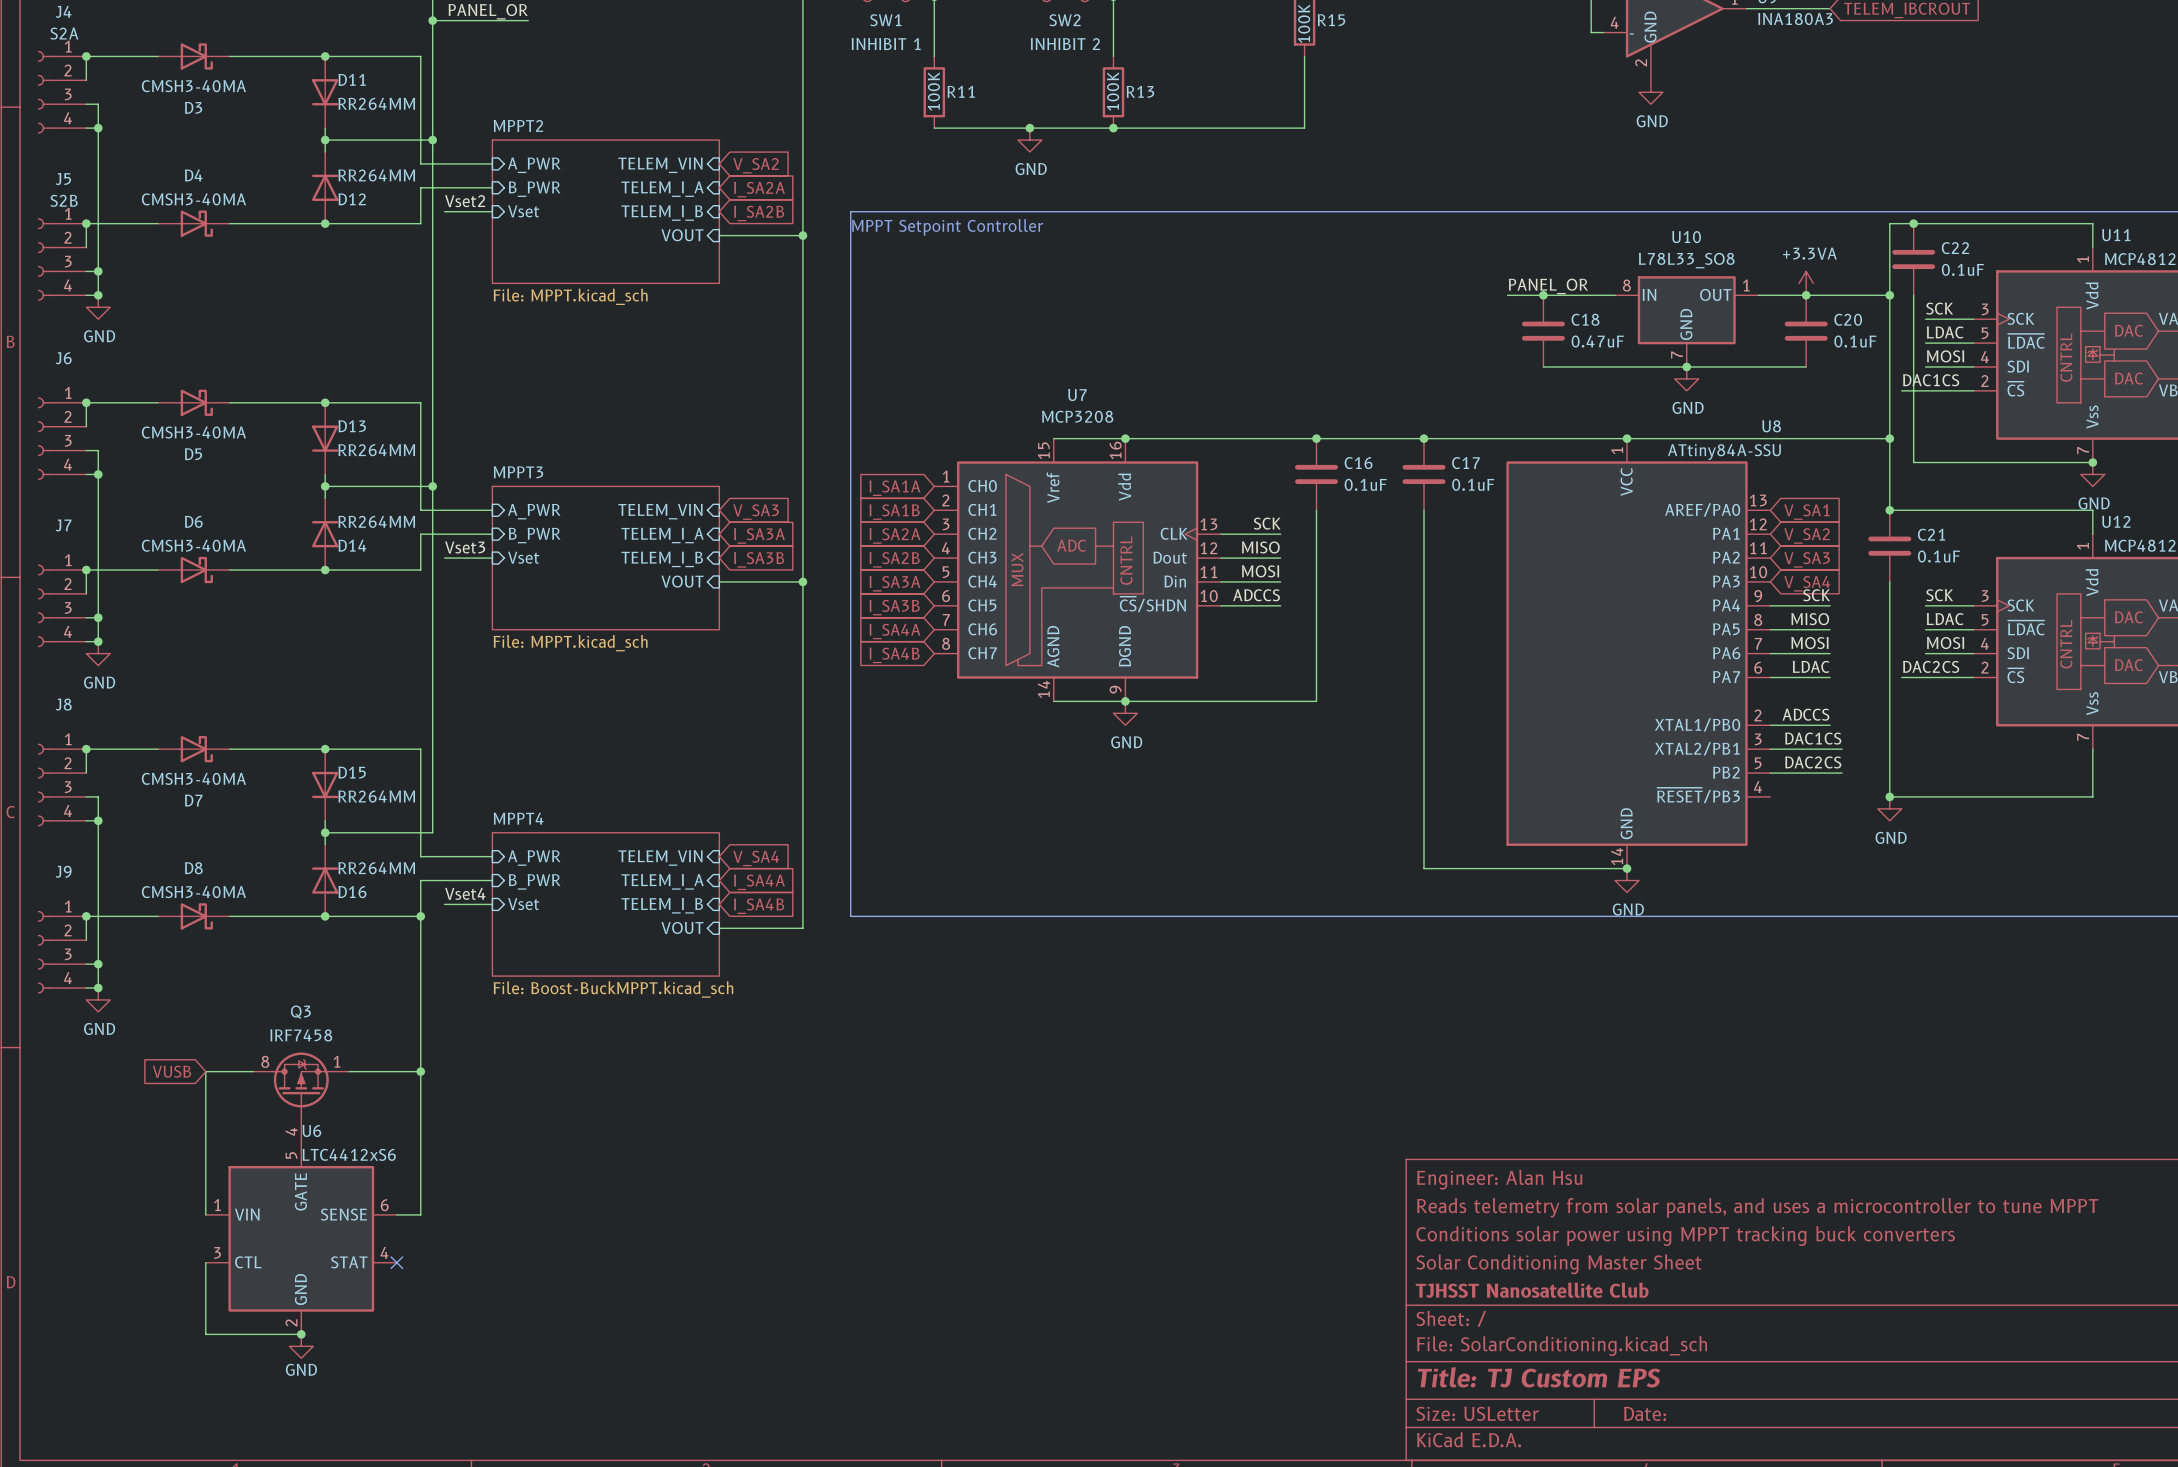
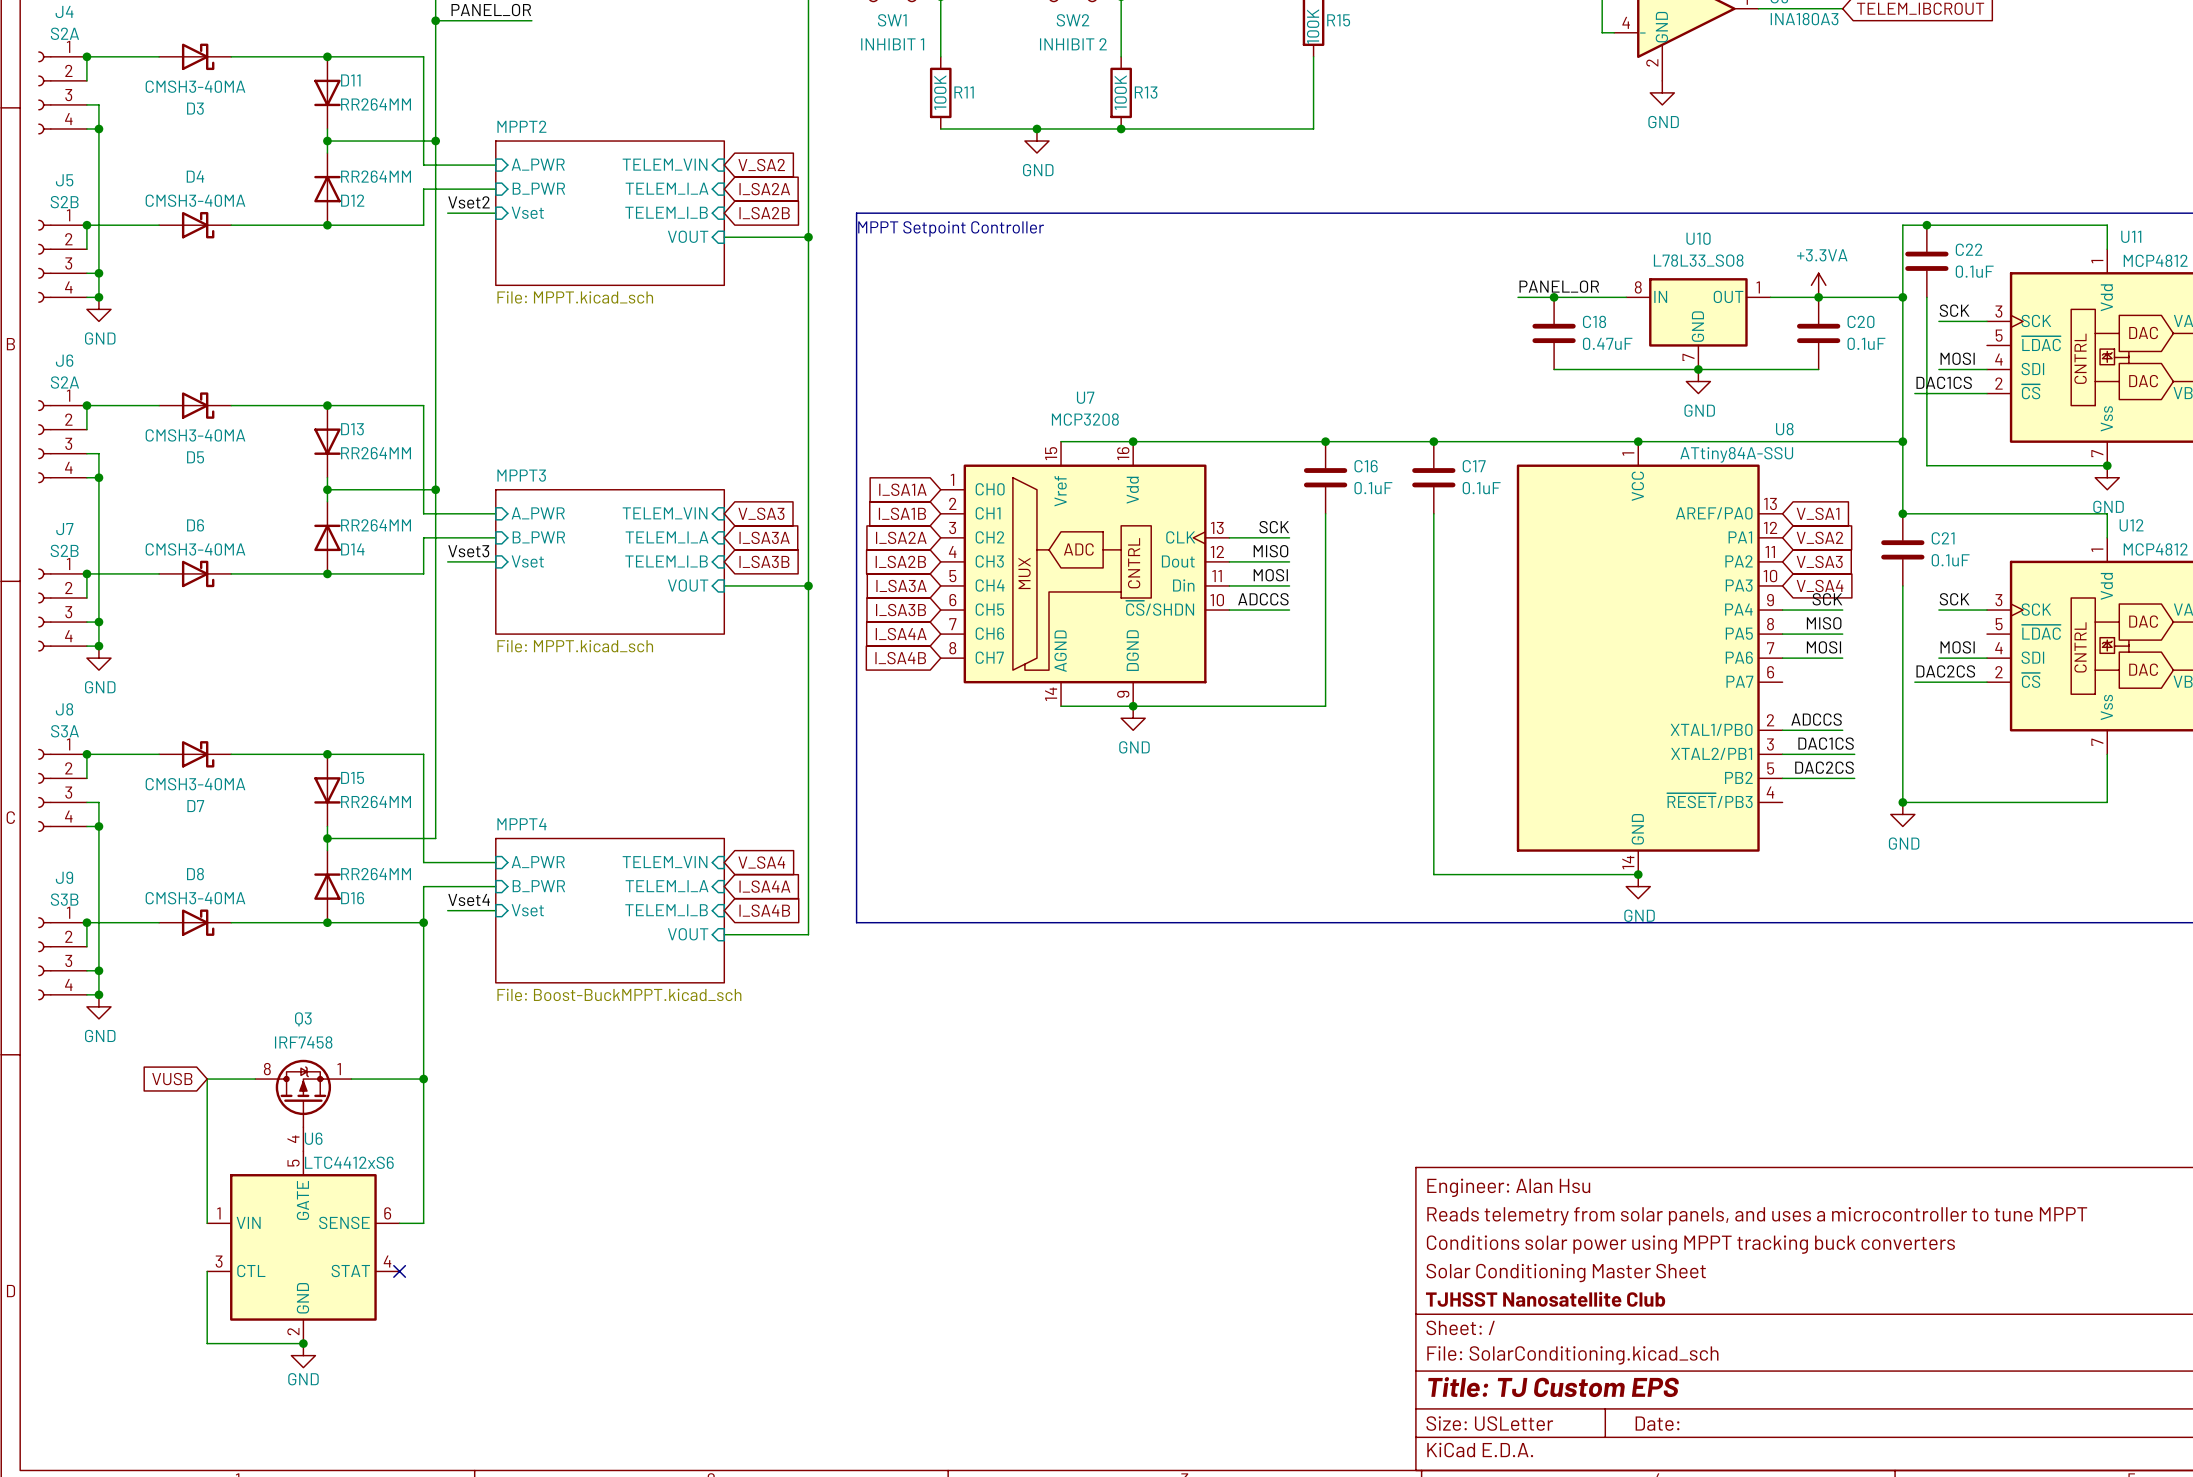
label: LDAC (1945, 332) -> none
wire: (1925, 343) (1973, 343) -> none
J6 value: none -> S2A (64, 382)
J7 value: none -> S2B (64, 550)
label: LDAC (1945, 619) -> none
wire: (1925, 629) (1973, 629) -> none
label: LDAC (1811, 666) -> none
wire: (1770, 677) (1830, 677) -> none
J8 value: none -> S3A (64, 731)
J9 value: none -> S3B (64, 899)

